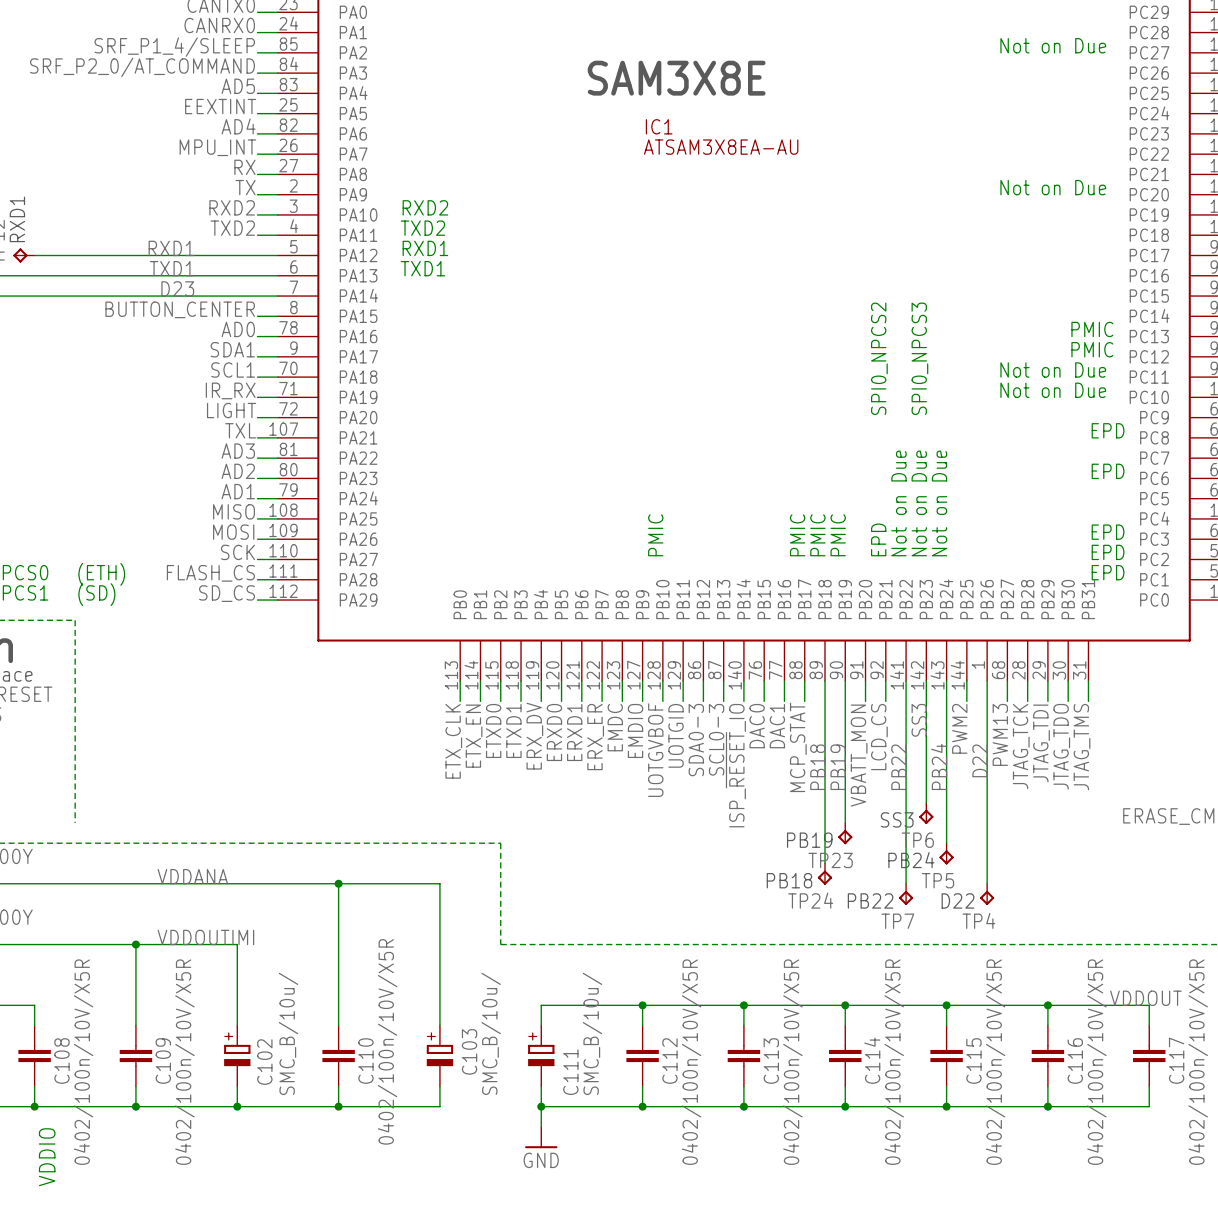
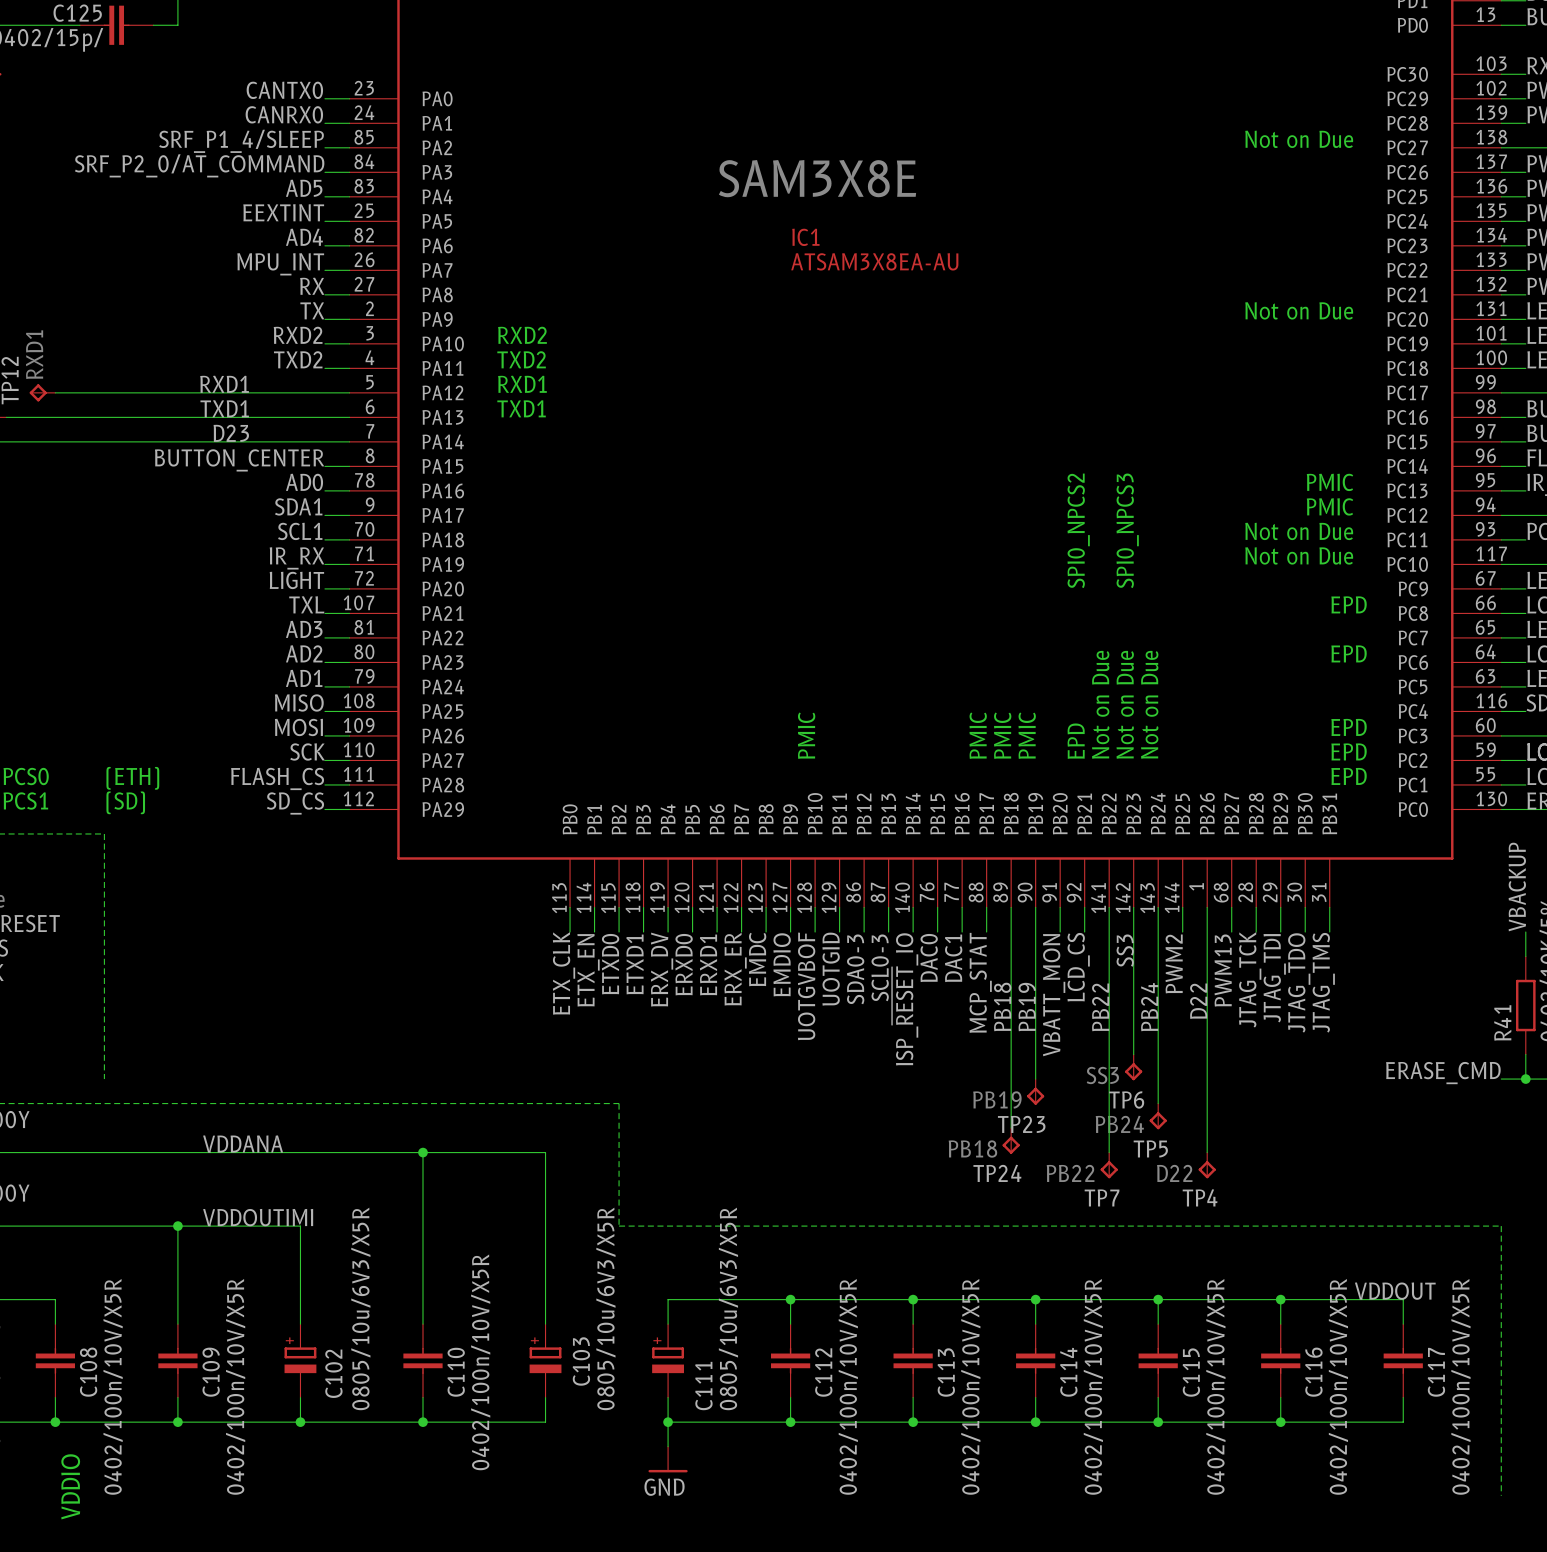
C102 value: SMC_B/10u/ (288, 1033) -> 0805/10u/6V3/X5R (360, 1308)
C103 value: SMC_B/10u/ (491, 1033) -> 0805/10u/6V3/X5R (605, 1308)
C111 value: SMC_B/10u/ (592, 1033) -> 0805/10u/6V3/X5R (728, 1308)

